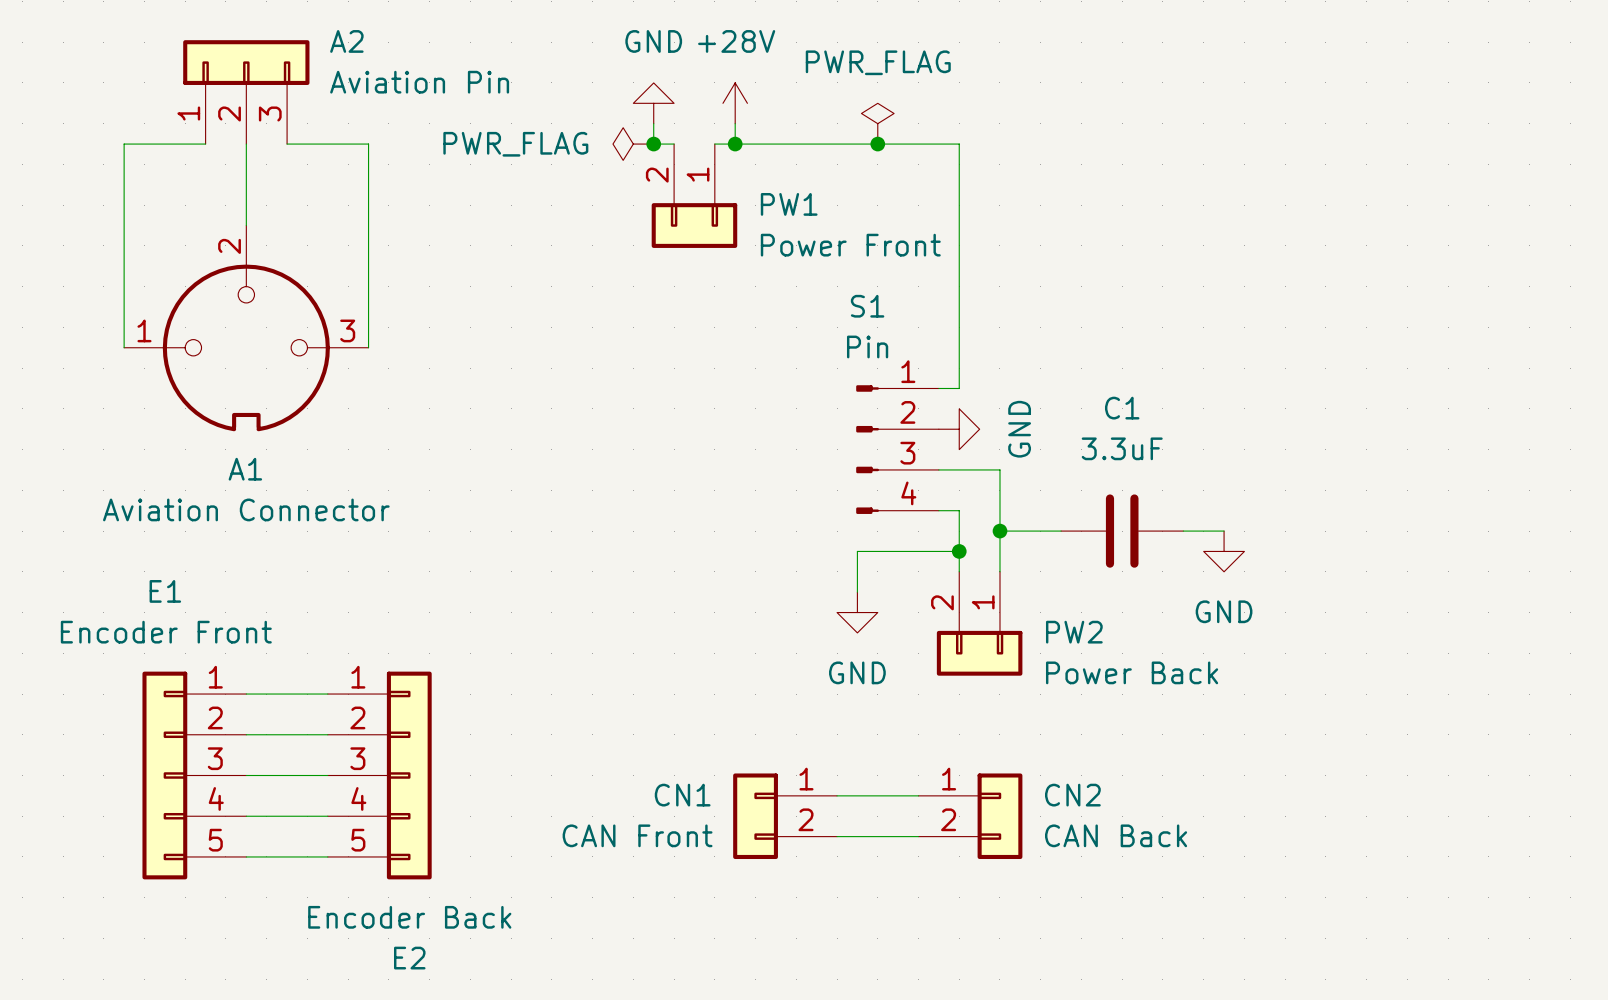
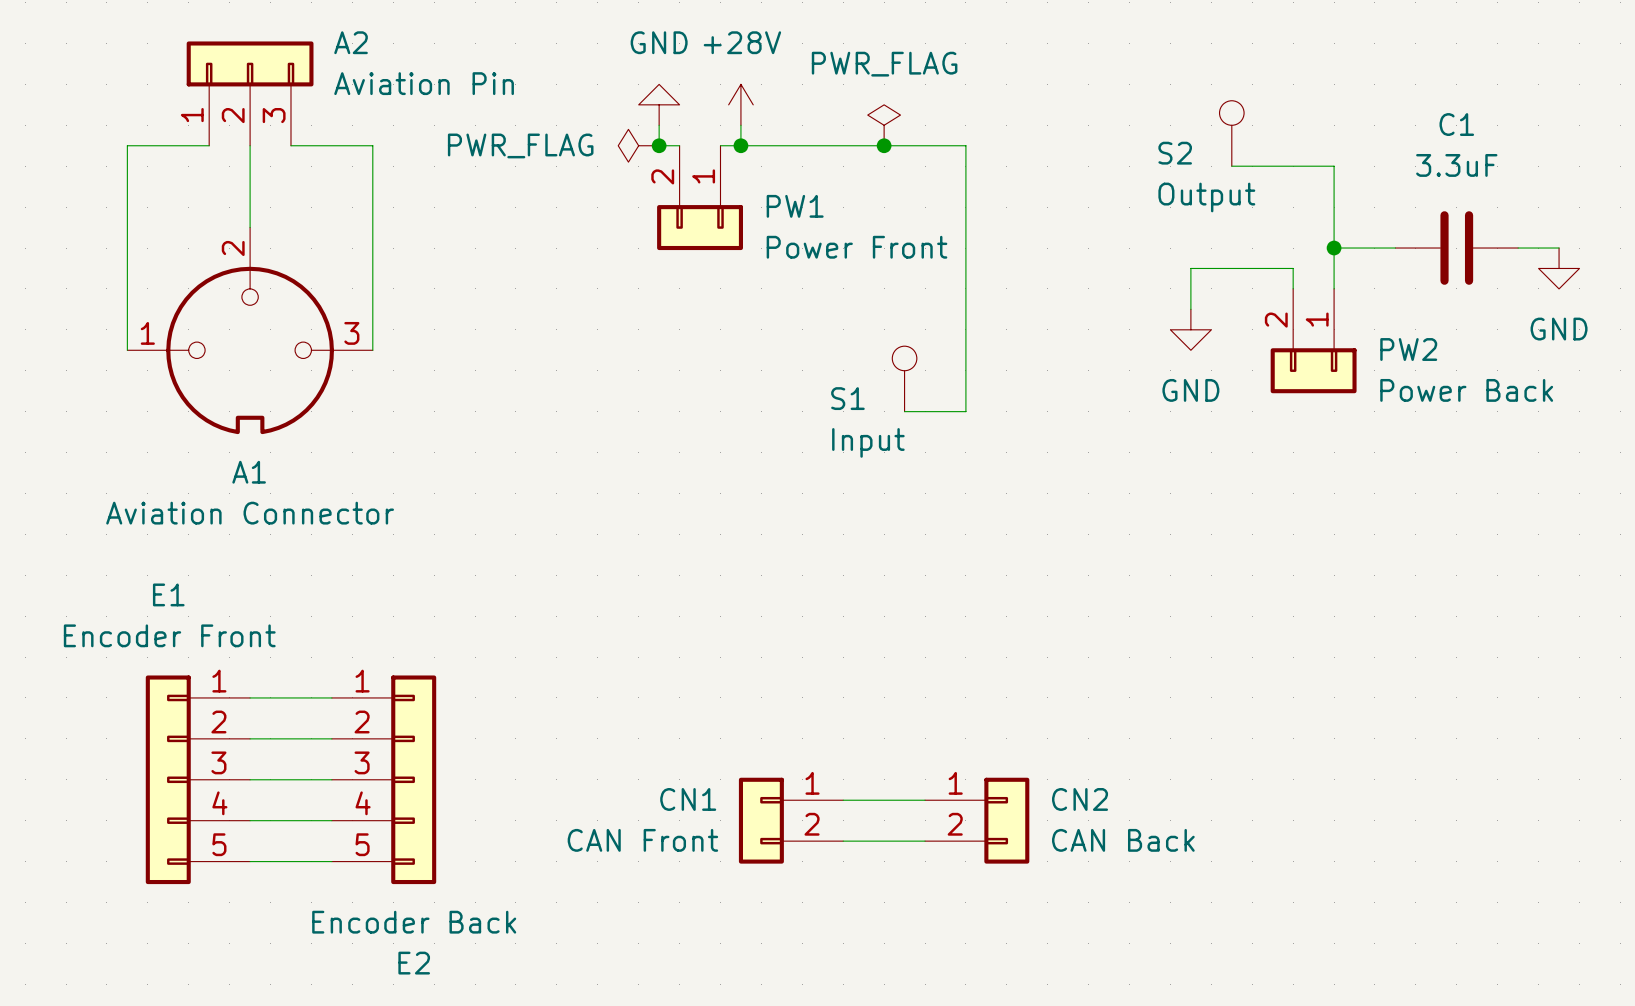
S2: none -> Output (1231, 133)
wire: none -> (1231, 166) (1334, 166) (1334, 288)
wire: none -> (1334, 248) (1395, 248)
junction: none -> (1334, 248)
wire: none -> (1518, 248) (1559, 248)
power symbol: none -> GND (1559, 268)
wire: none -> (1293, 288) (1293, 268) (1190, 268) (1190, 309)
S1 name position: S1 (867, 306) -> S1 (847, 398)
power symbol: none -> GND (1190, 329)
S1 value: Pin (867, 346) -> Input (868, 442)
S1 symbol: [856, 385, 939, 514] -> [892, 346, 917, 412]
wire: (938, 388) (959, 388) -> (904, 411) (965, 411) (965, 391)
power symbol: GND (959, 429) -> none
wire: (938, 469) (999, 469) (999, 571) -> none
wire: (938, 510) (959, 510) (959, 571) -> none
wire: (999, 531) (1061, 531) -> none
junction: (999, 531) -> none
C1 position: (1122, 531) -> (1456, 248)
wire: (1183, 531) (1224, 531) -> none
wire: (959, 551) (857, 551) (857, 592) -> none
junction: (959, 551) -> none
power symbol: GND (1224, 551) -> none
power symbol: GND (857, 612) -> none
PW2 position: (979, 623) -> (1313, 341)

